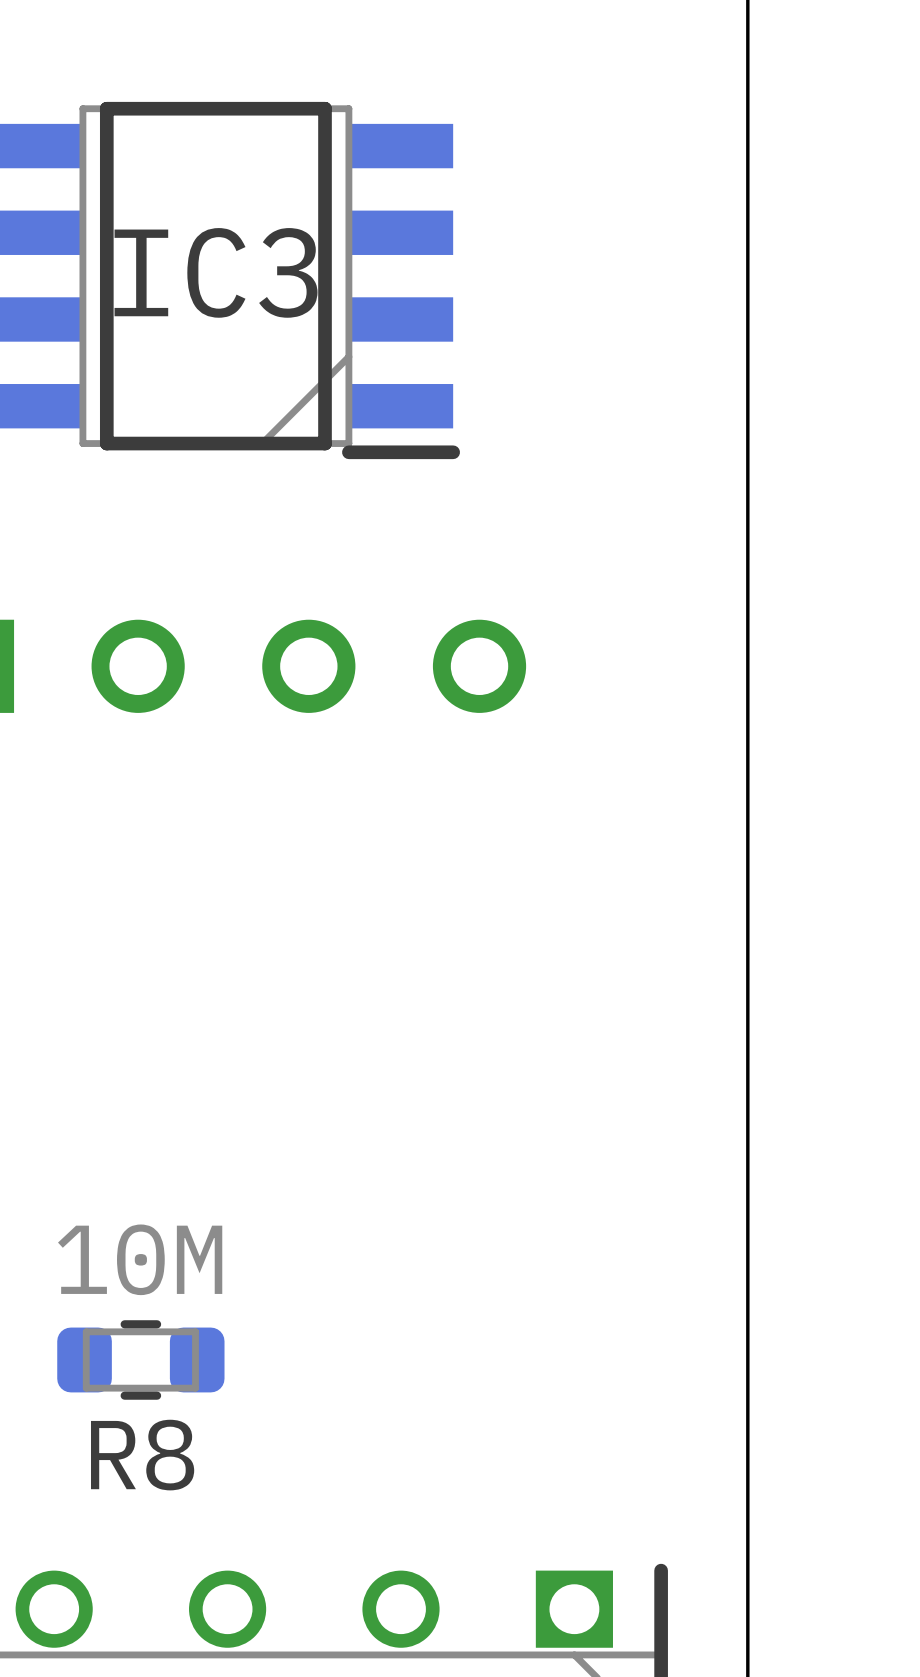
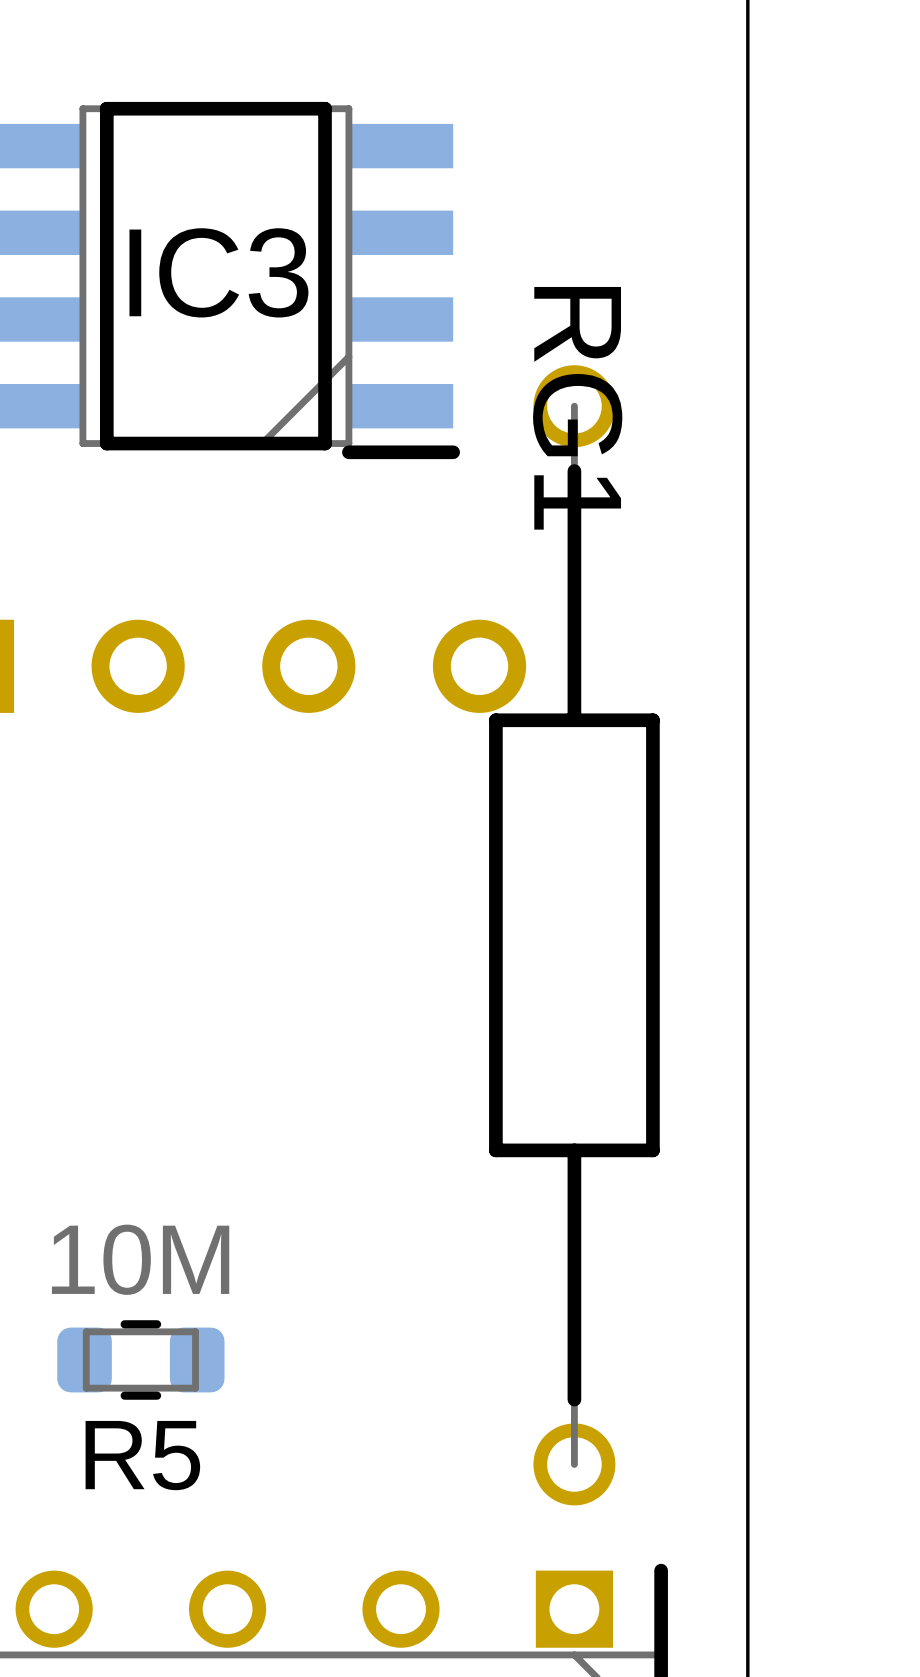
RG1: none -> (574, 935)
R8 name: R8 (142, 1455) -> R5 (142, 1455)

